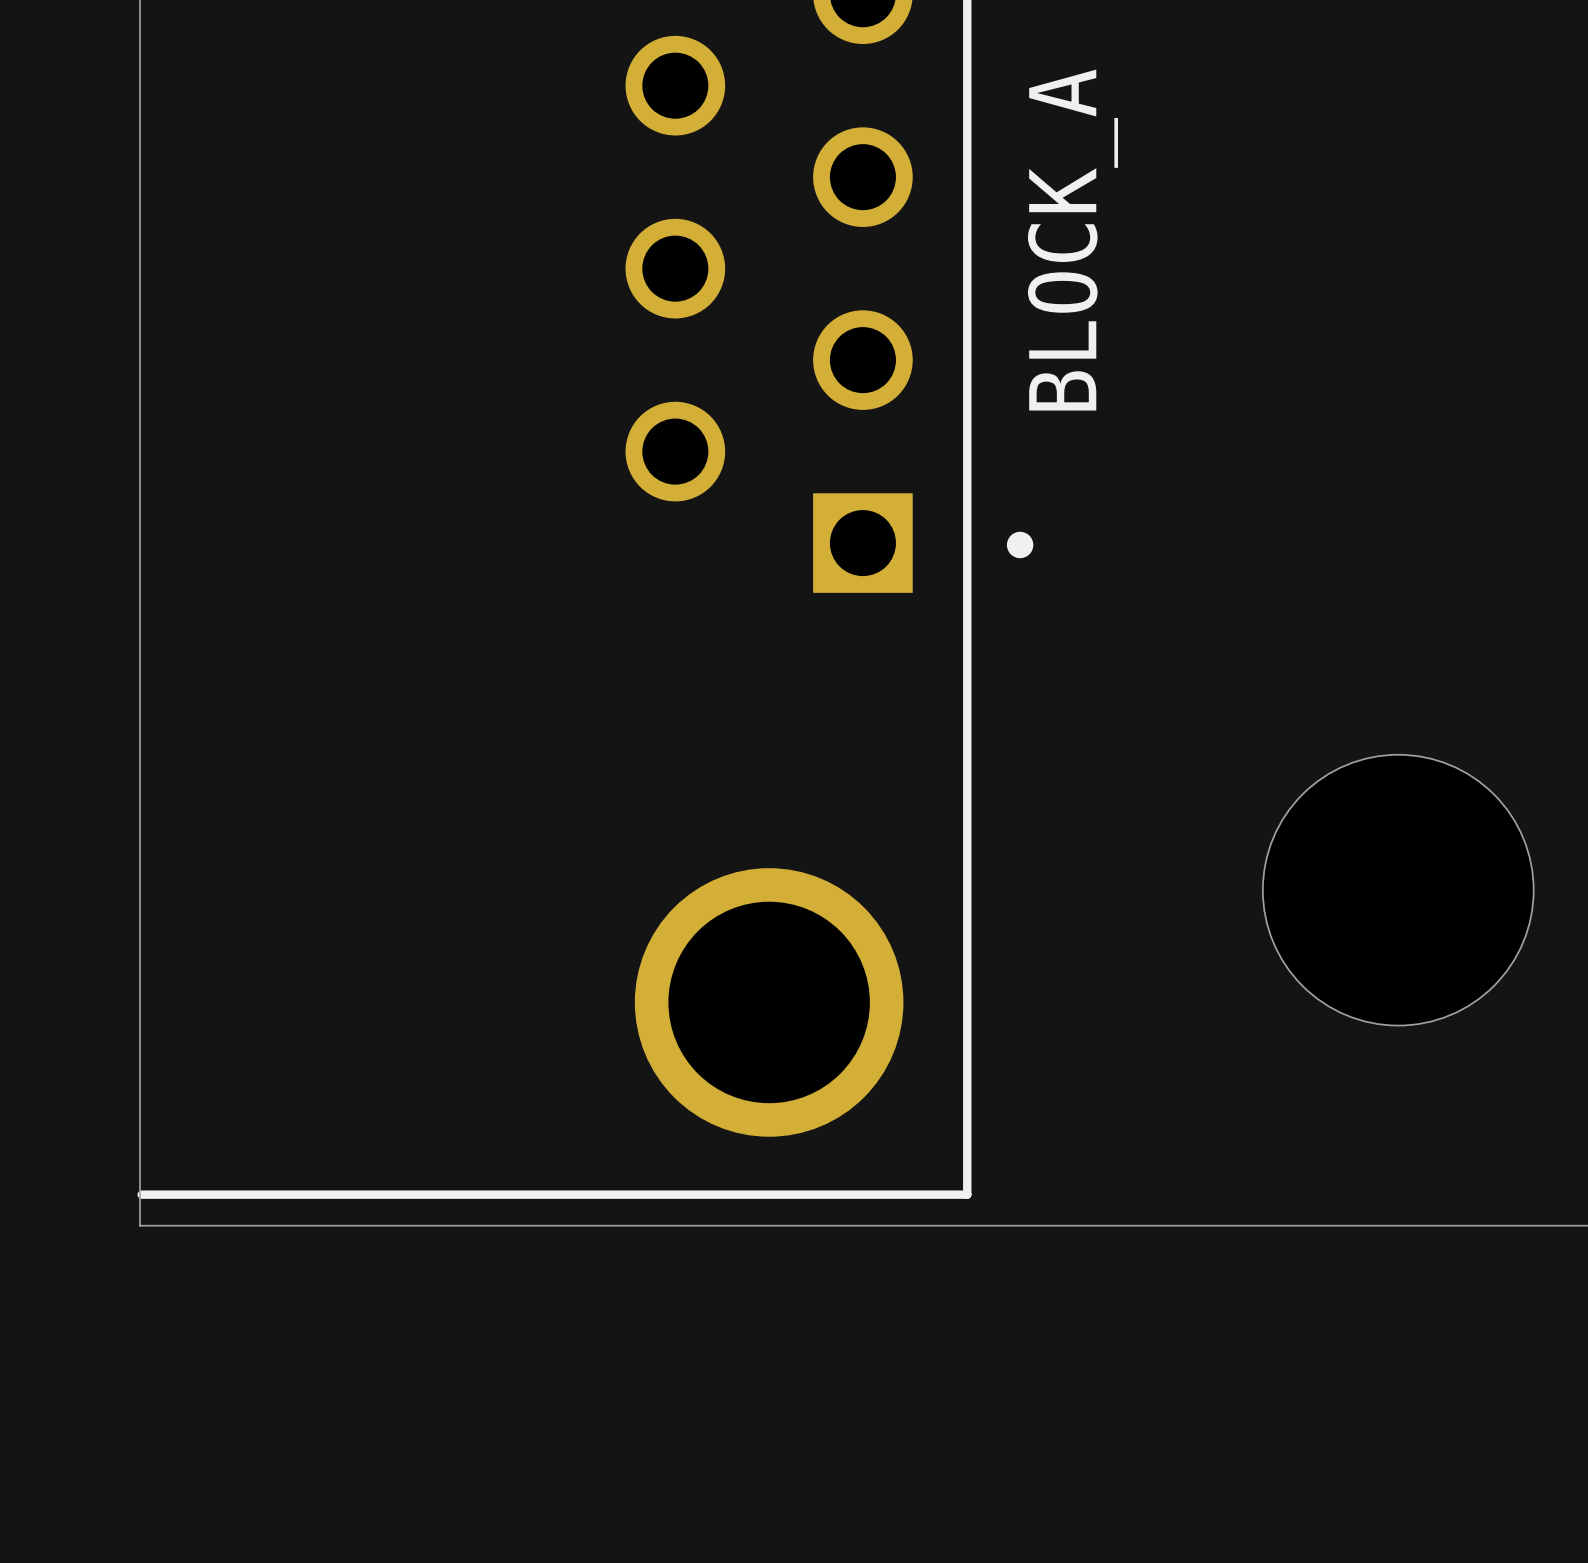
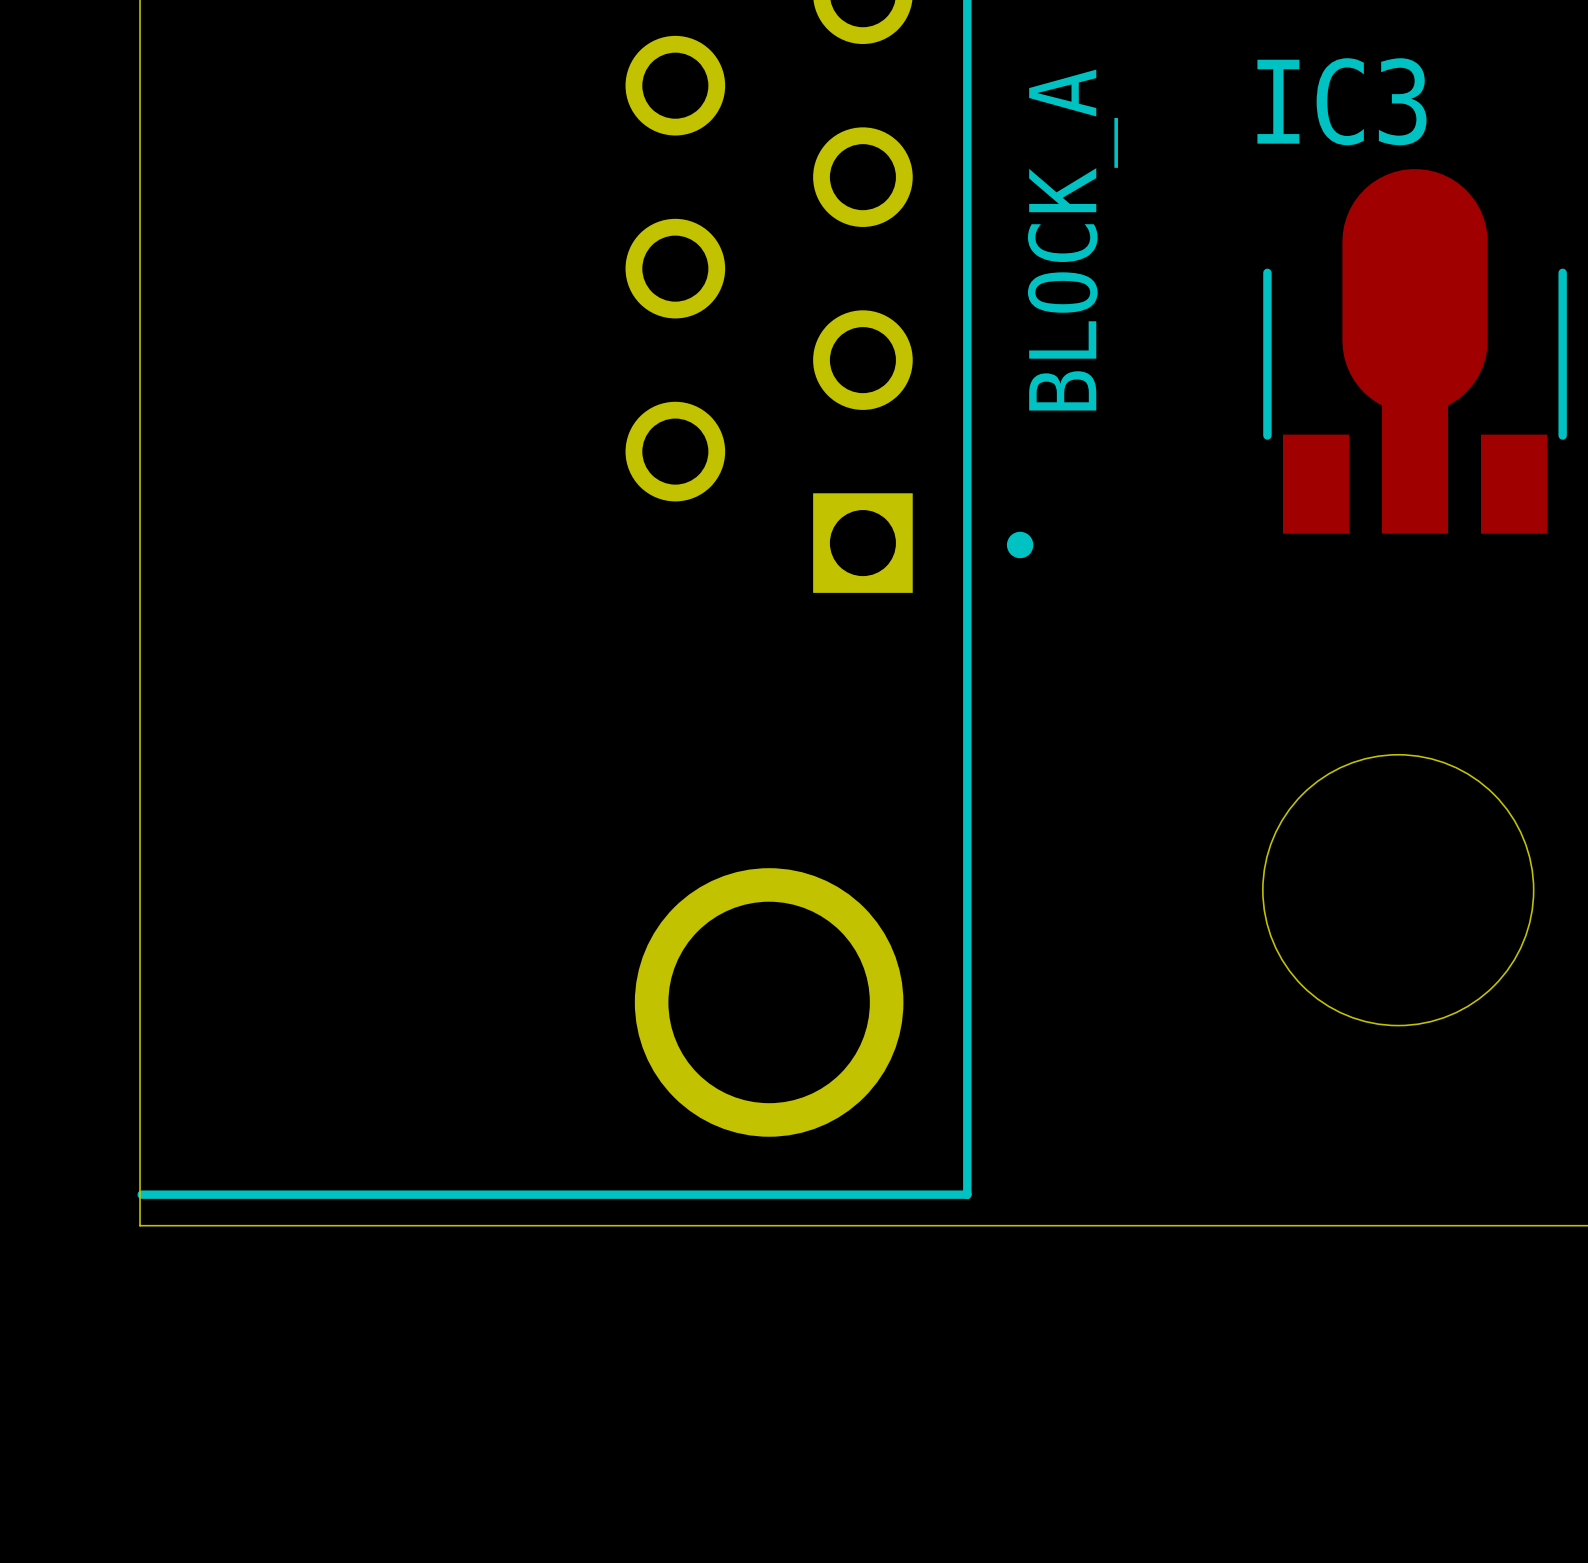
IC3: none -> (1415, 351)

